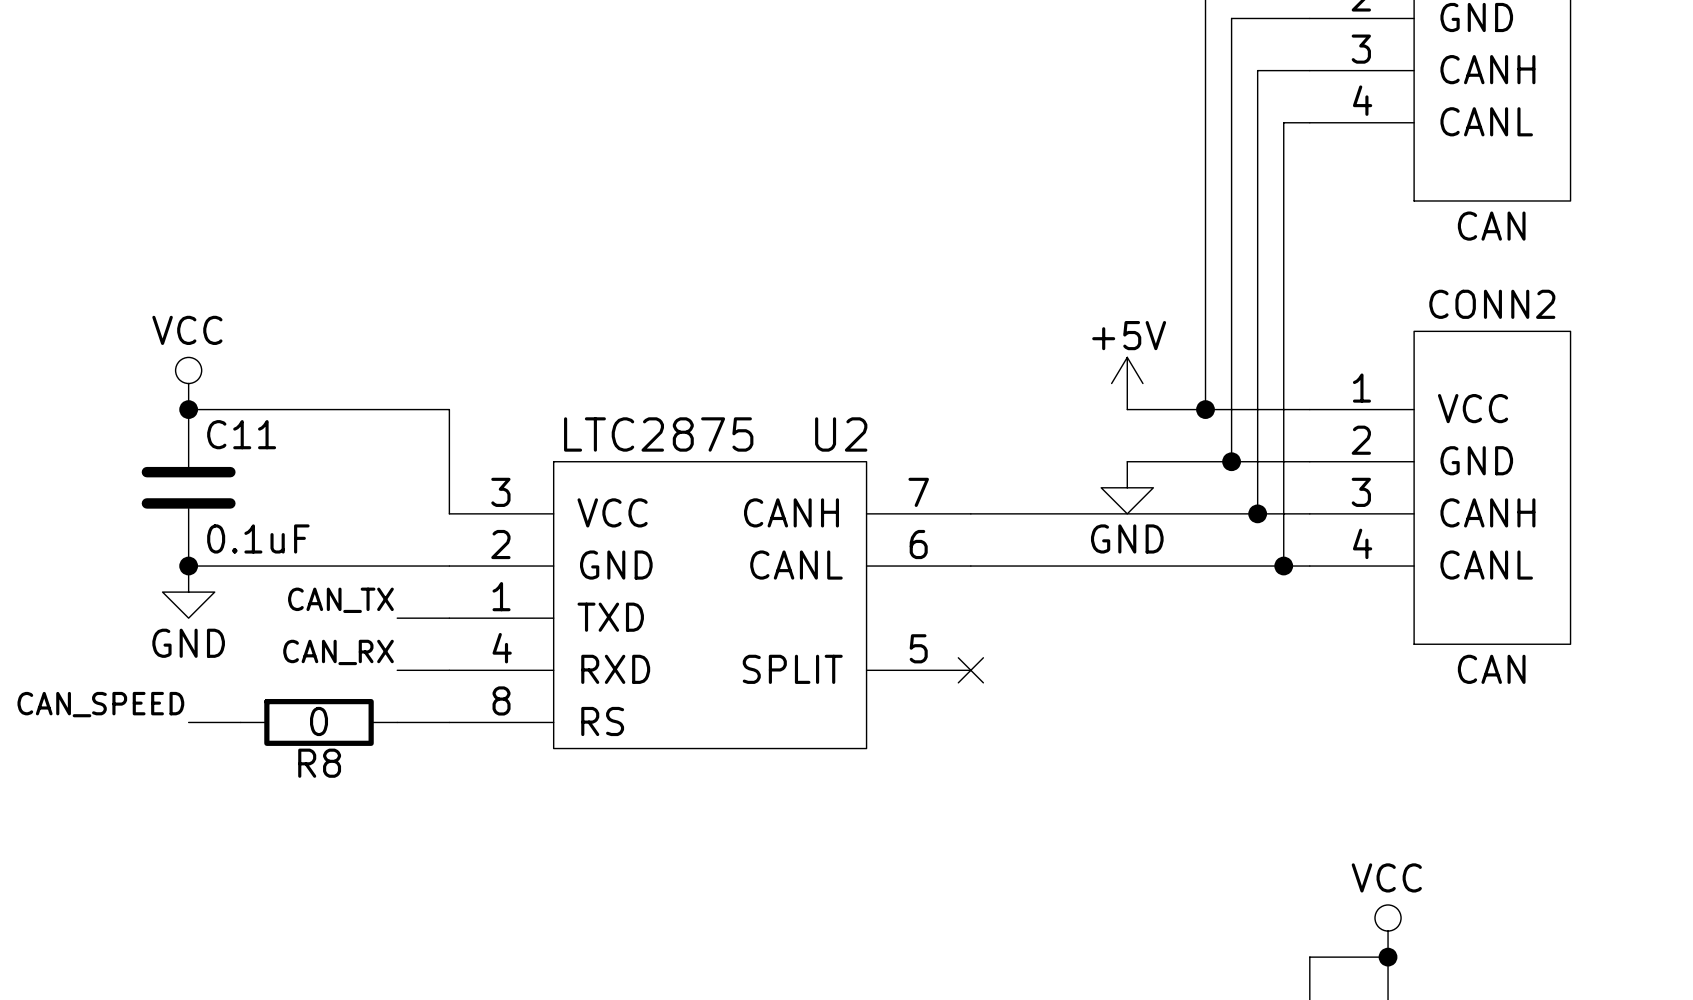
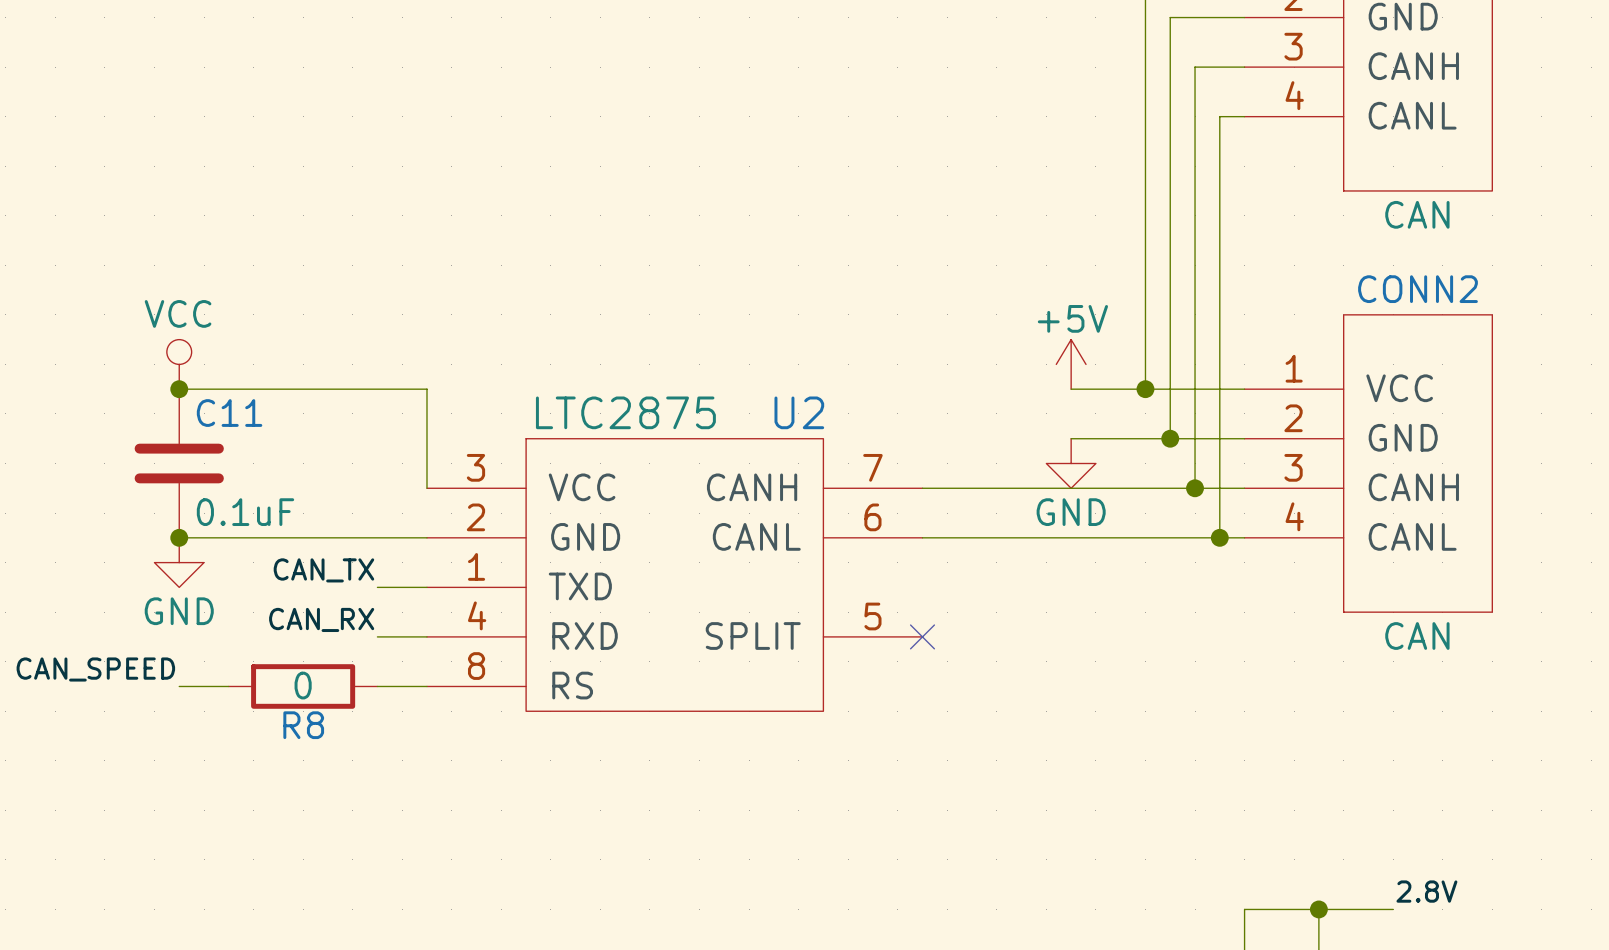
power symbol: VCC (1388, 931) -> none
label: none -> 2.8V (1426, 891)
wire: none -> (1318, 909) (1393, 909)

